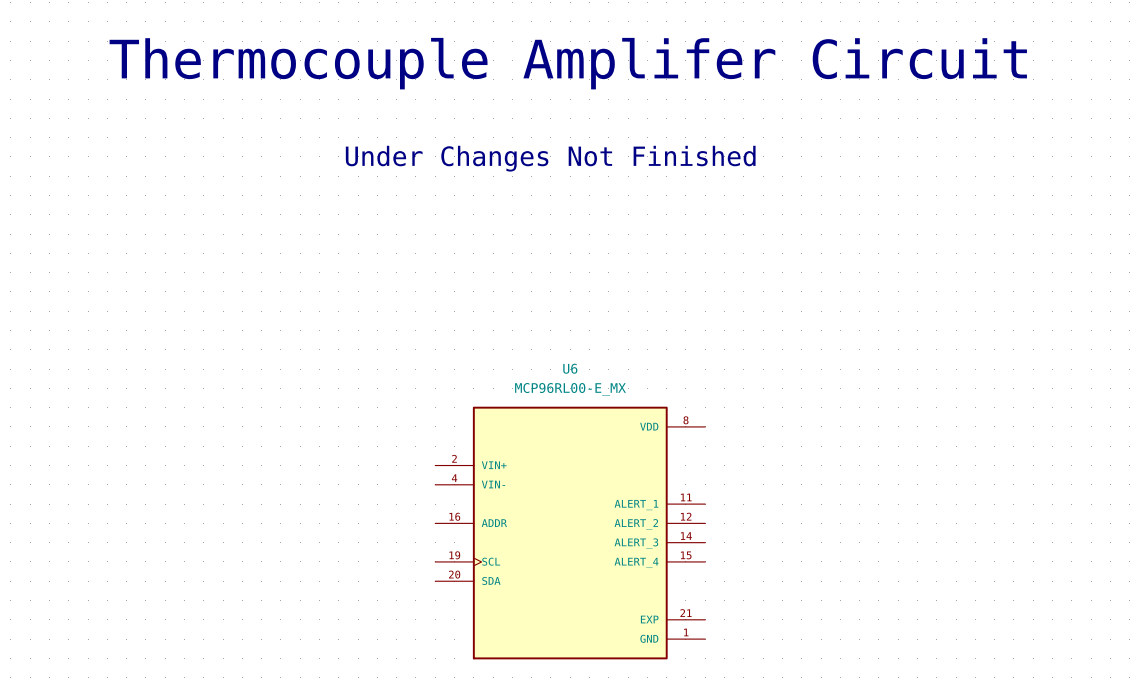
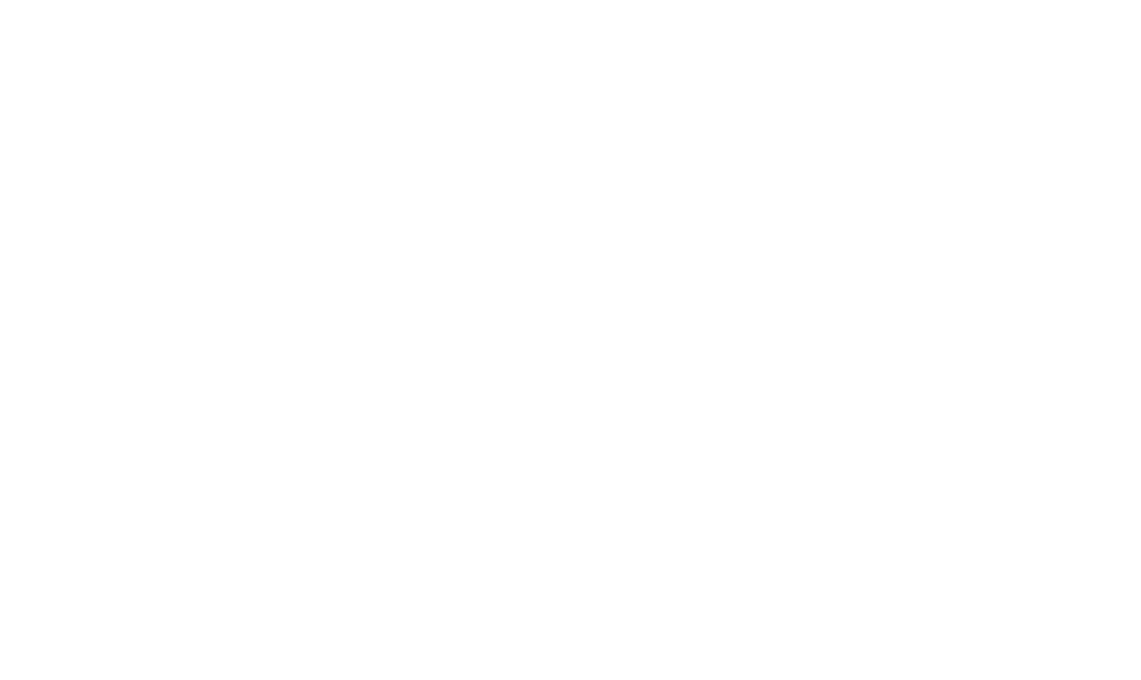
text: Thermocouple Amplifer Circuit (568, 63) -> none
text: Under Changes Not Finished (550, 158) -> none
U6: MCP96RL00-E_MX (570, 533) -> none

